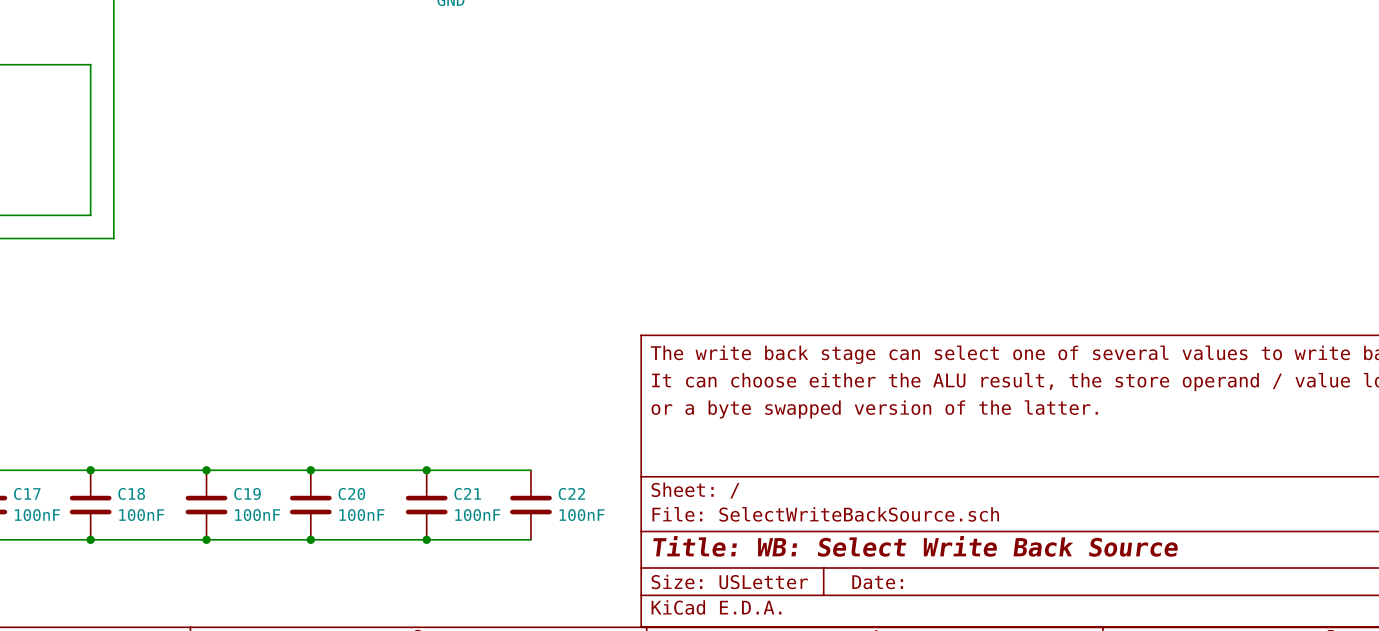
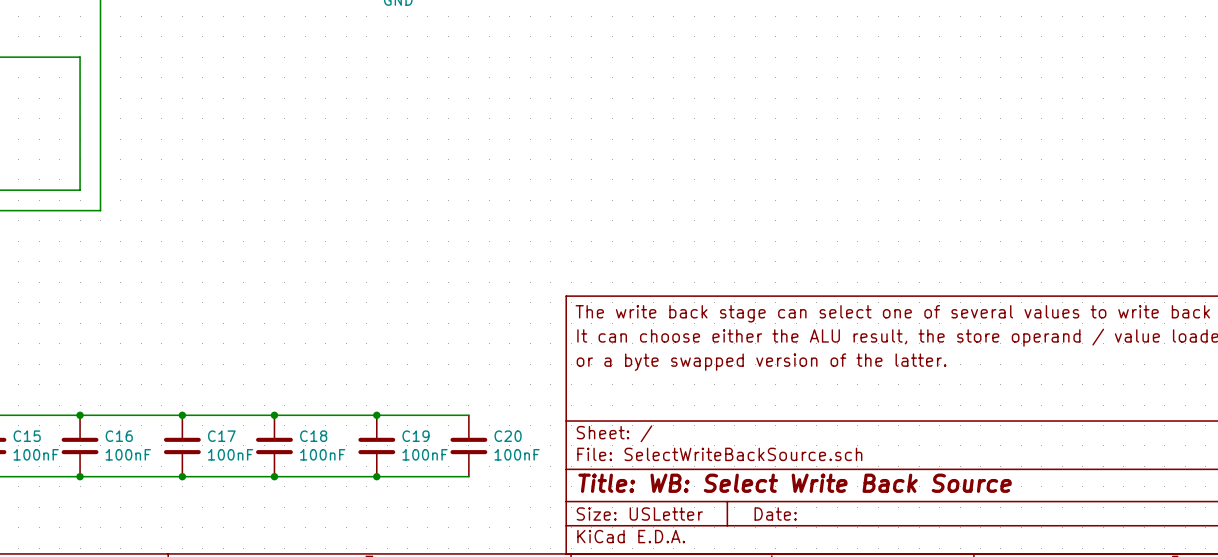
C17 name: C17 (27, 493) -> C15 (27, 436)
C18 name: C18 (131, 493) -> C16 (119, 436)
C19 name: C19 (247, 493) -> C17 (221, 436)
C20 name: C20 (351, 493) -> C18 (313, 436)
C21 name: C21 (467, 493) -> C19 (415, 436)
C22 name: C22 (571, 493) -> C20 (508, 436)

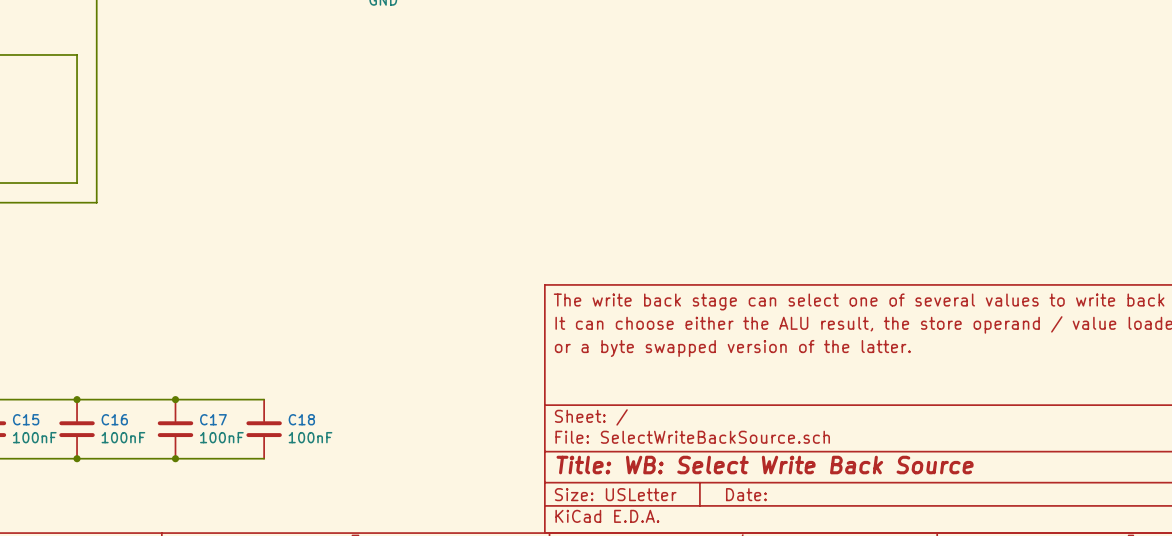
wire: (274, 415) (468, 415) -> none
junction: (274, 415) -> none
junction: (376, 415) -> none
C19: 100nF (376, 445) -> none
C20: 100nF (468, 445) -> none
wire: (274, 476) (468, 476) -> none
junction: (274, 476) -> none
junction: (376, 476) -> none

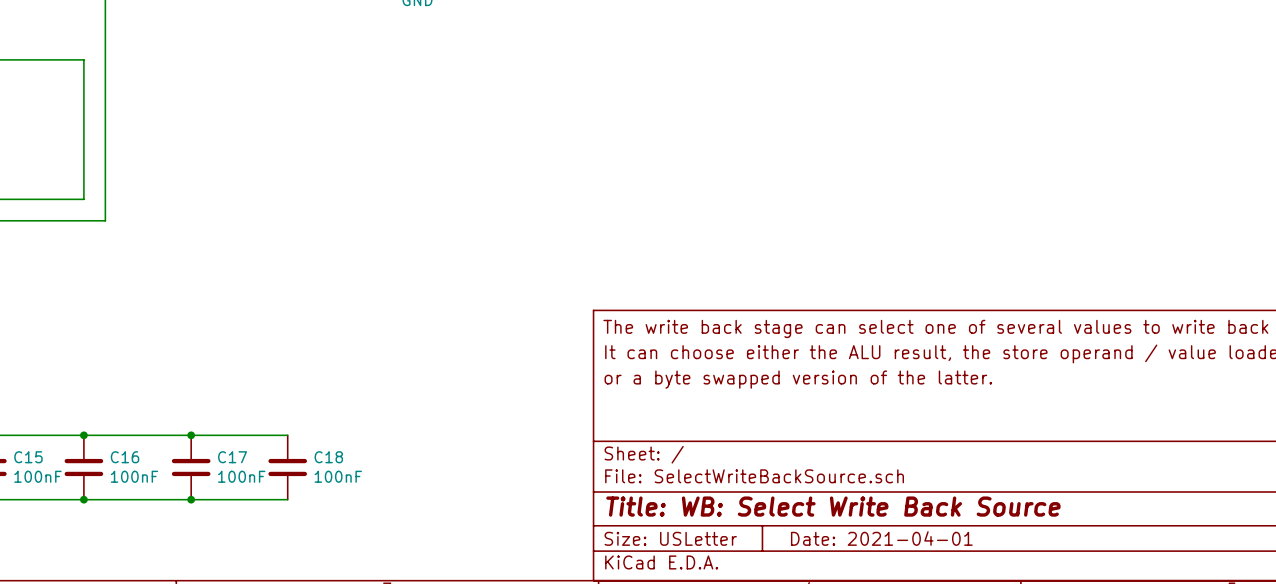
title block: Date: (746, 494) -> Date: 2021-04-01 (881, 538)

